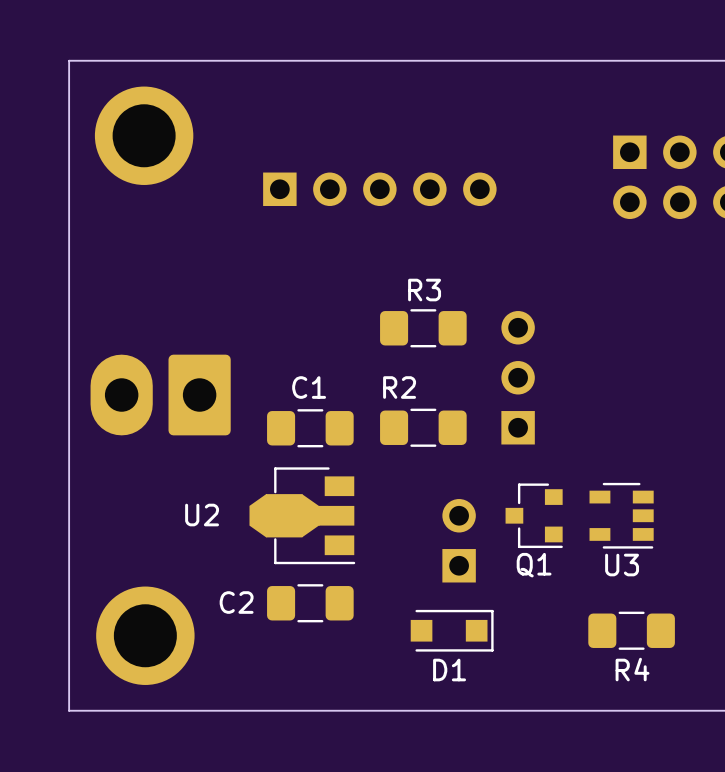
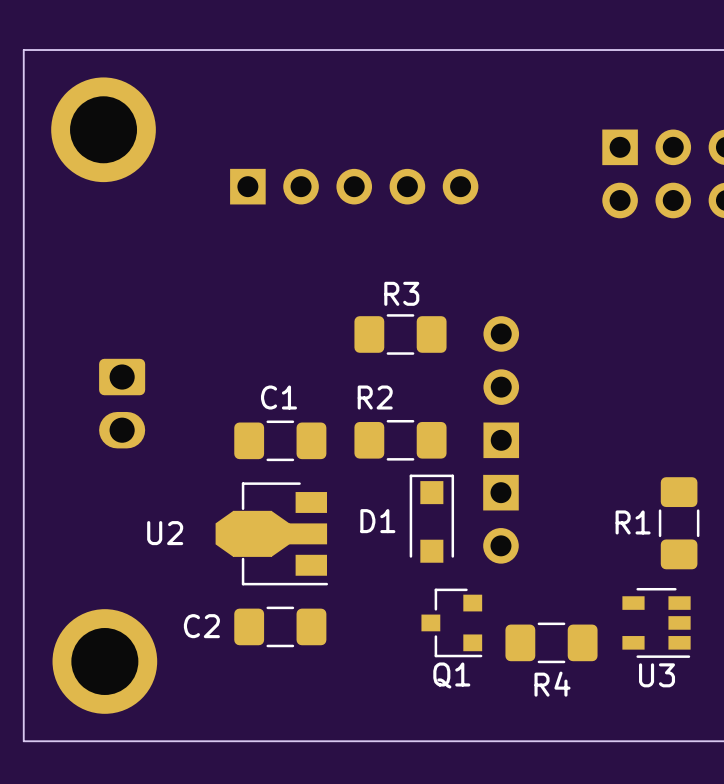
part footprint: [90, 354, 231, 436] -> [99, 358, 146, 449]
R1: none -> (679, 523)
Q1 position: (534, 515) -> (451, 622)
U3 position: (621, 515) -> (656, 622)
part rotation: 0° (459, 540) -> 180° (500, 519)
part position: (459, 540) -> (500, 519)
D1 rotation: 0° (452, 630) -> 90° counterclockwise (431, 518)
D1 position: (452, 630) -> (431, 518)
R4 position: (631, 630) -> (551, 642)
D1 name position: D1 (449, 670) -> D1 (377, 521)

